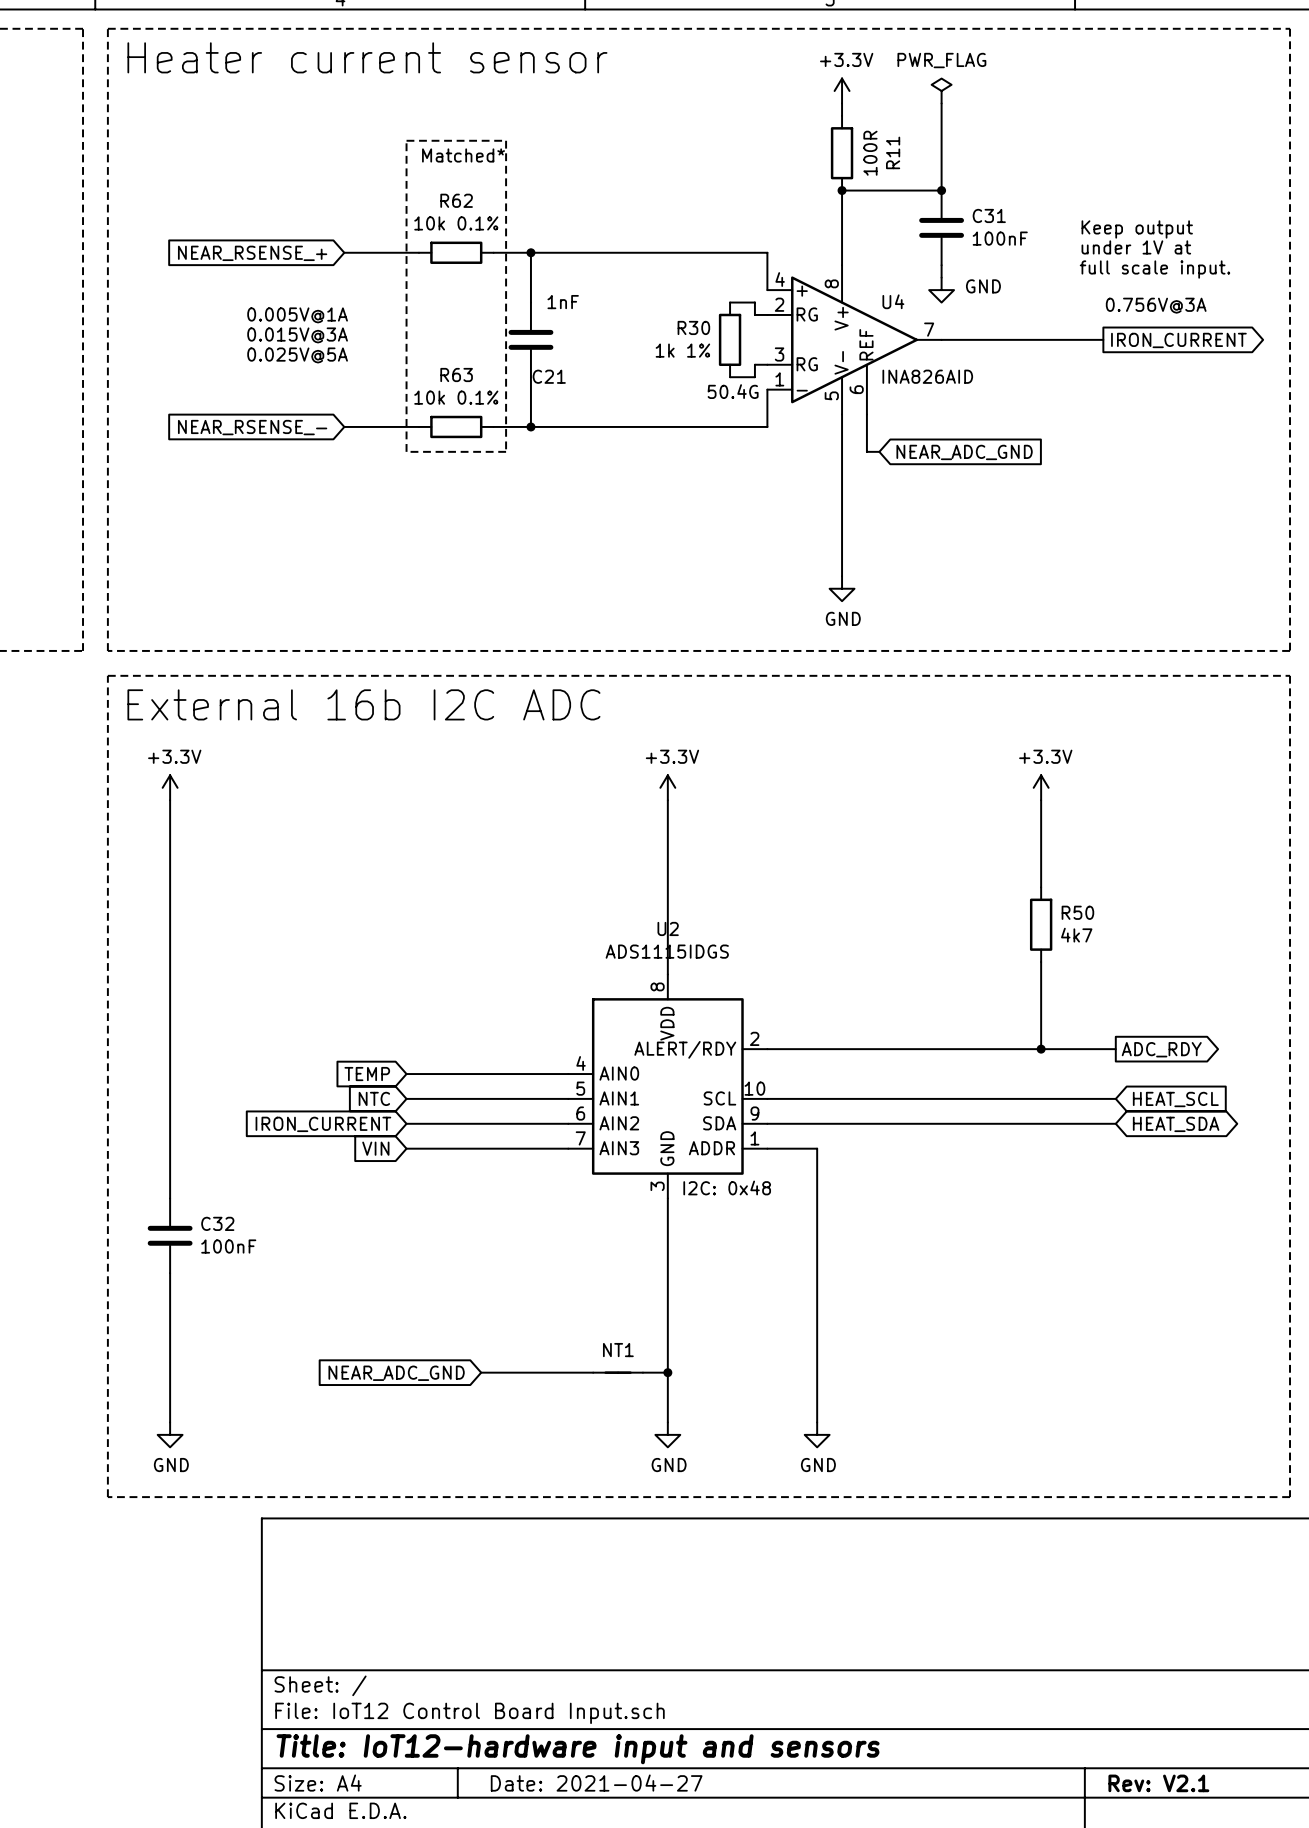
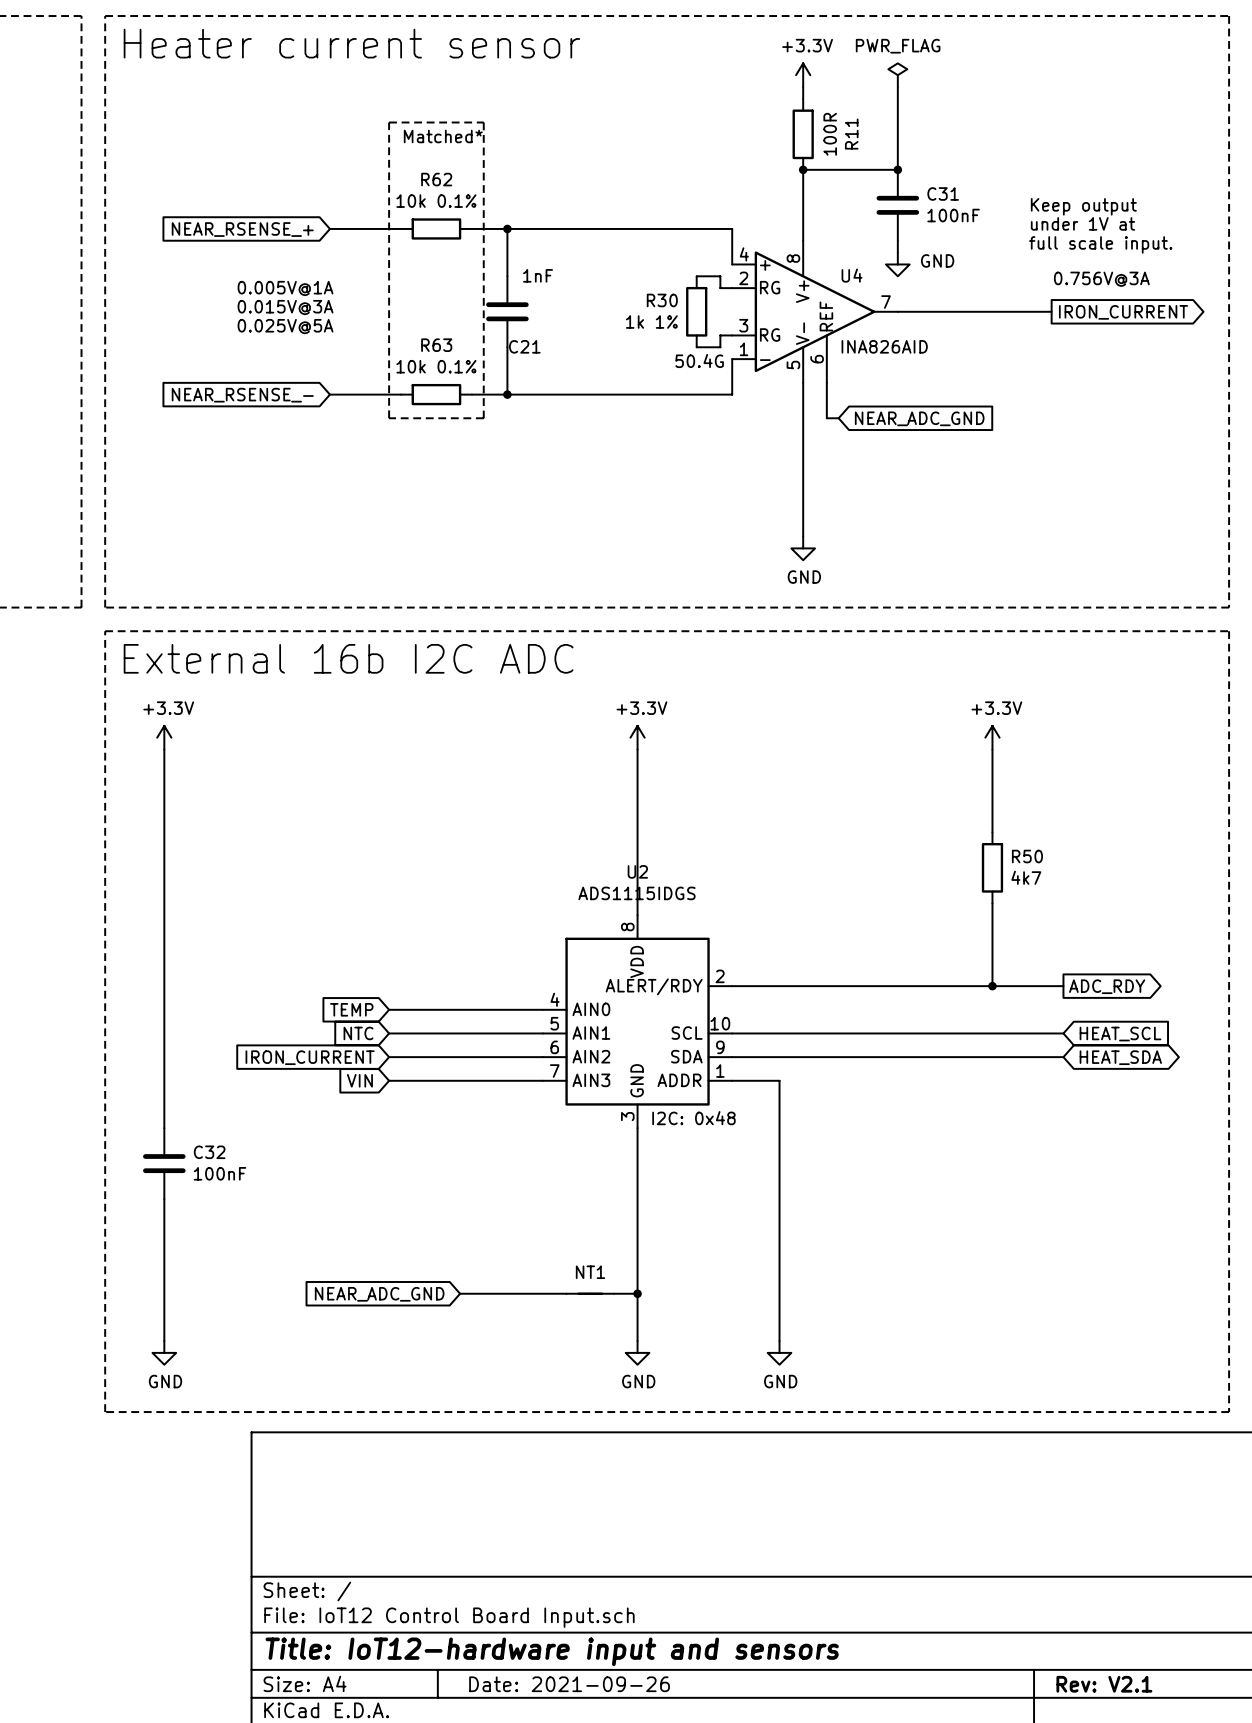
title block: Date: 2021-04-27 (596, 1783) -> Date: 2021-09-26 (569, 1684)

